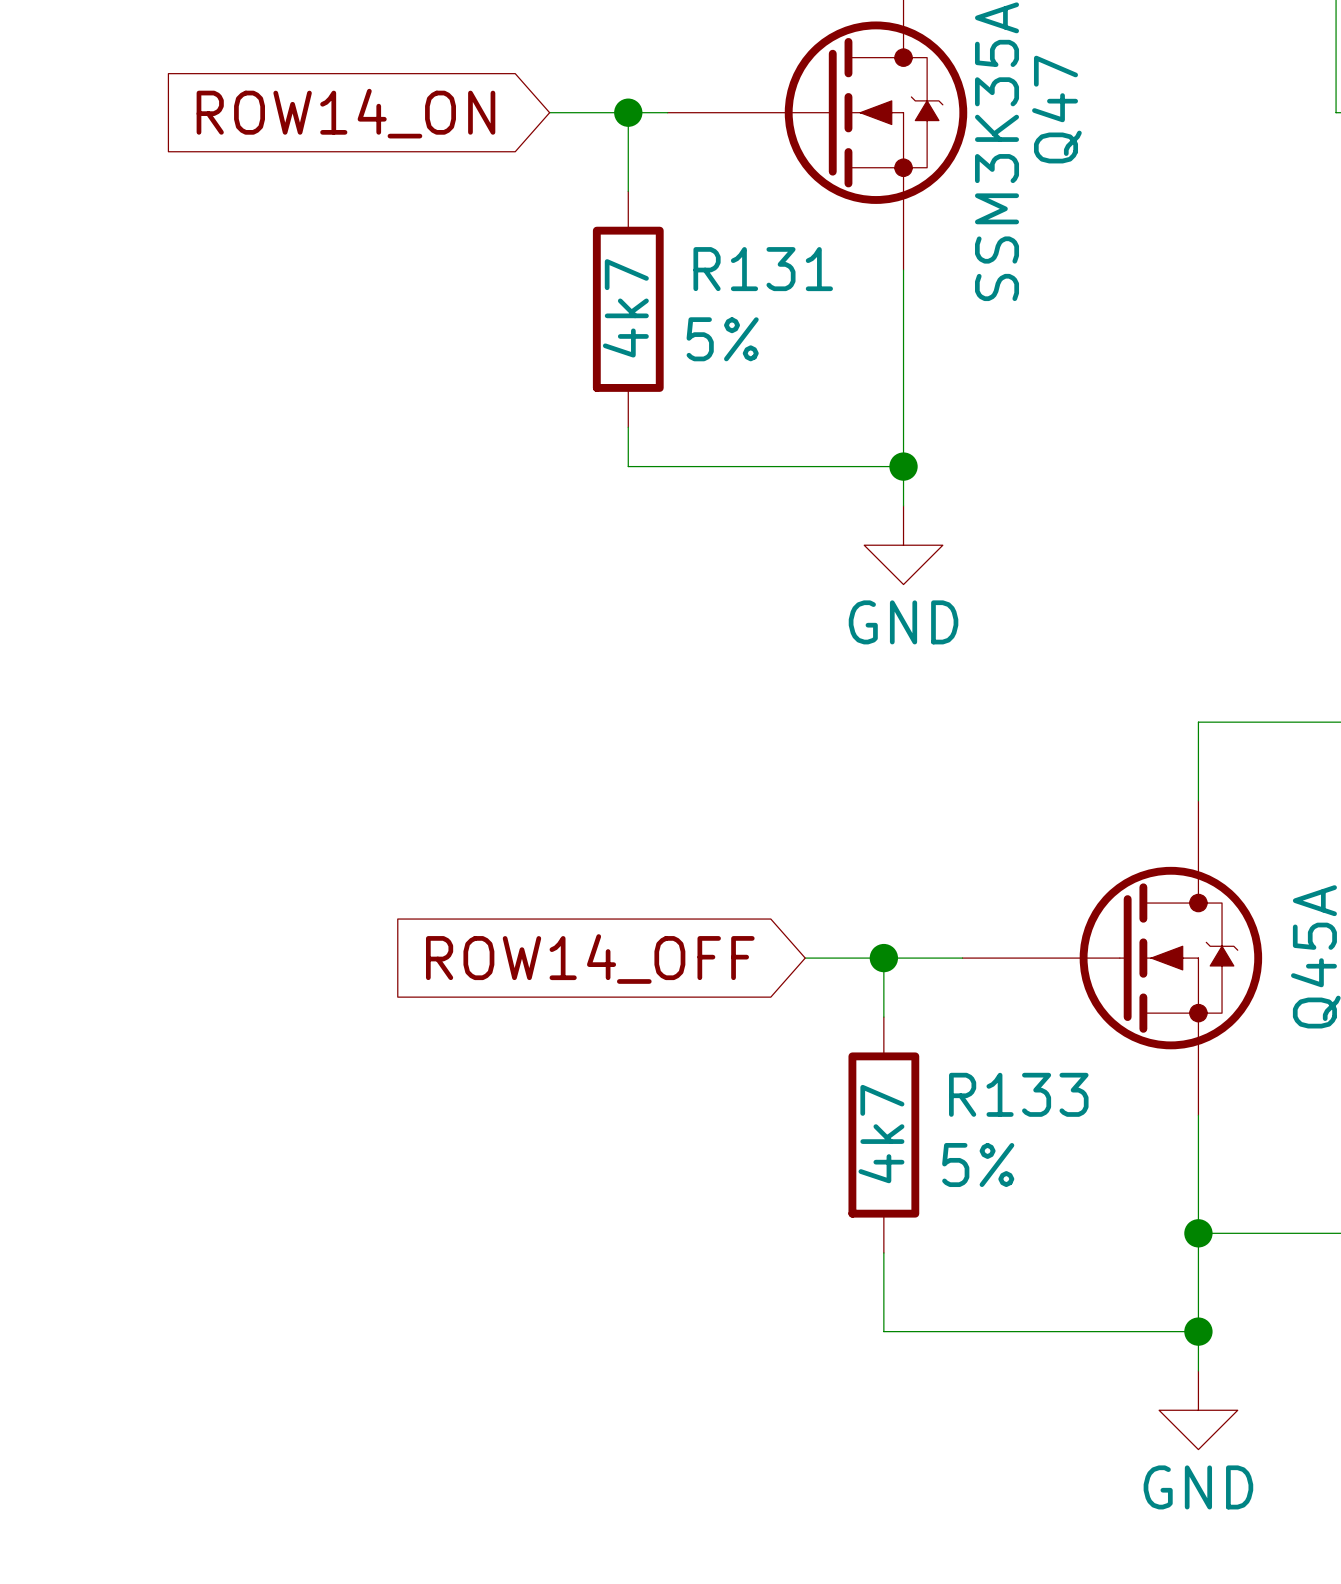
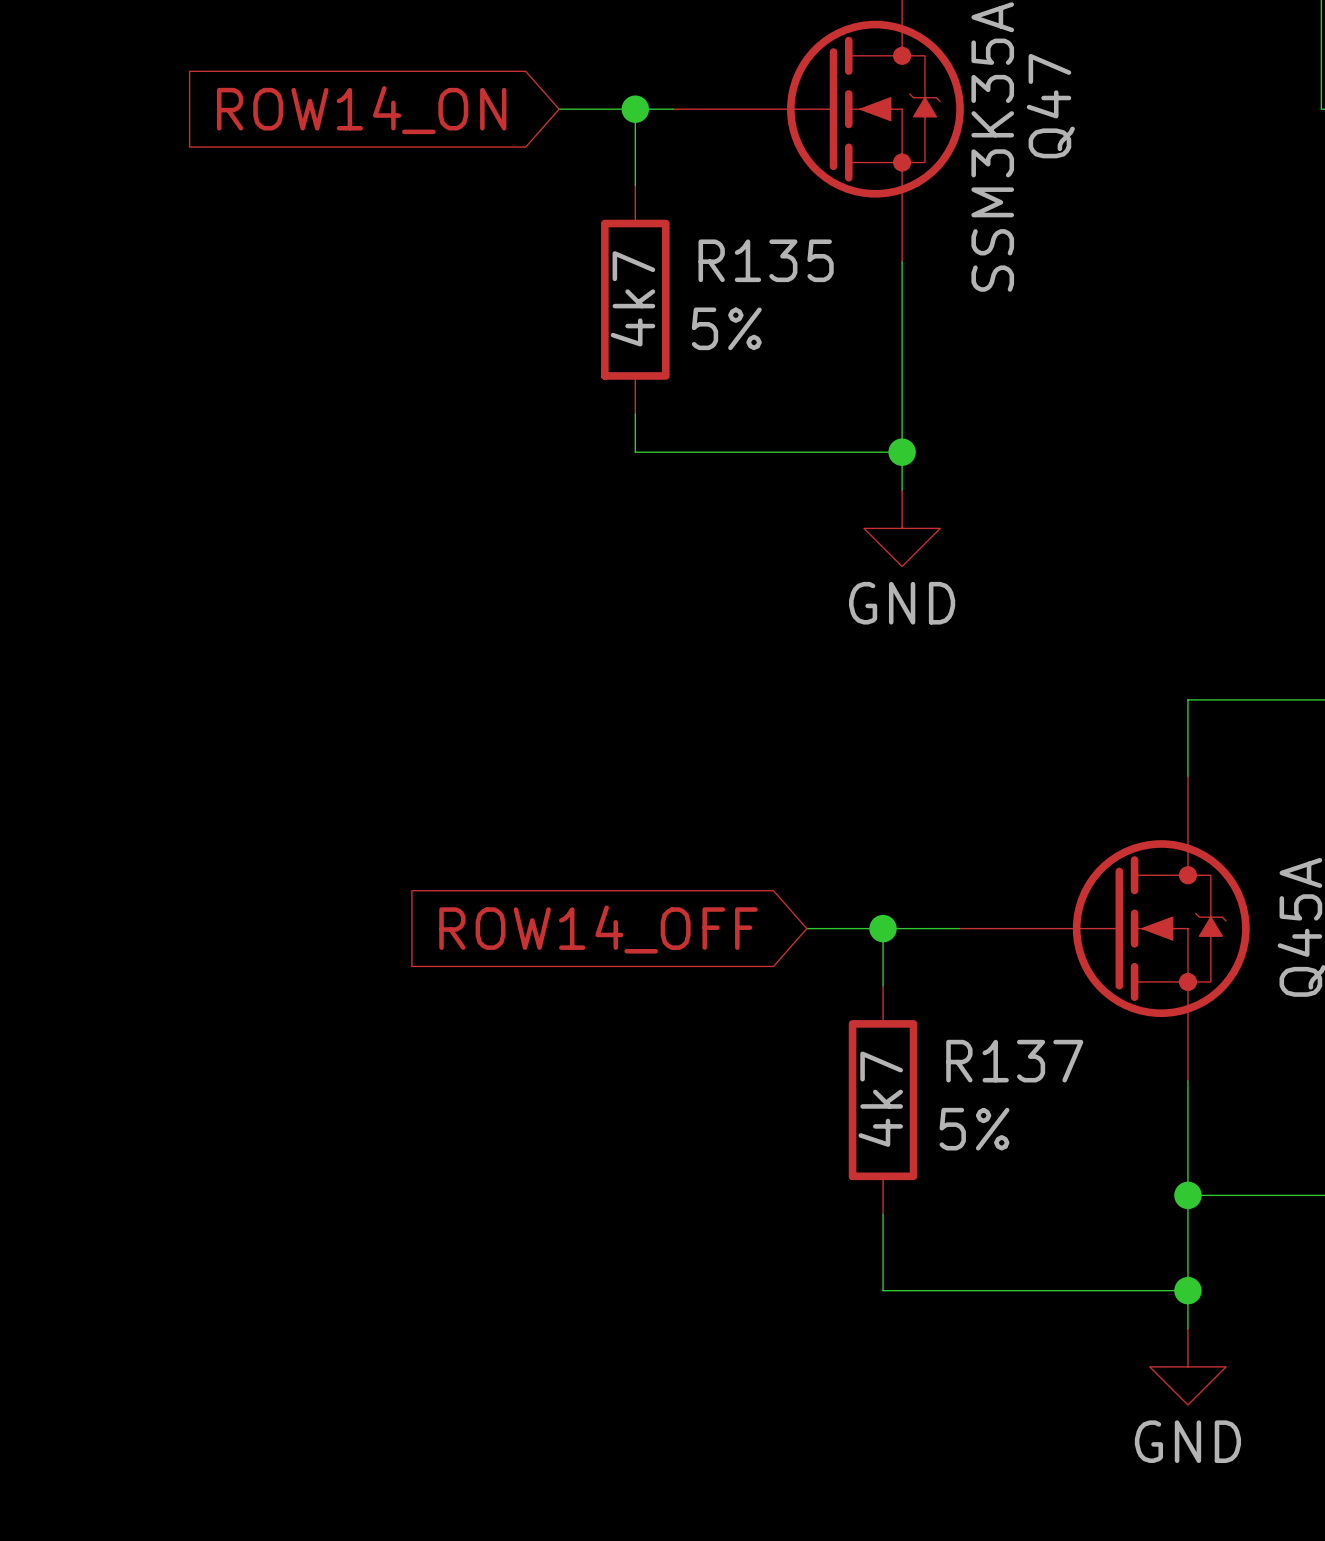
R131 name: R131 (763, 269) -> R135 (766, 260)
R133 name: R133 (1018, 1094) -> R137 (1014, 1061)

